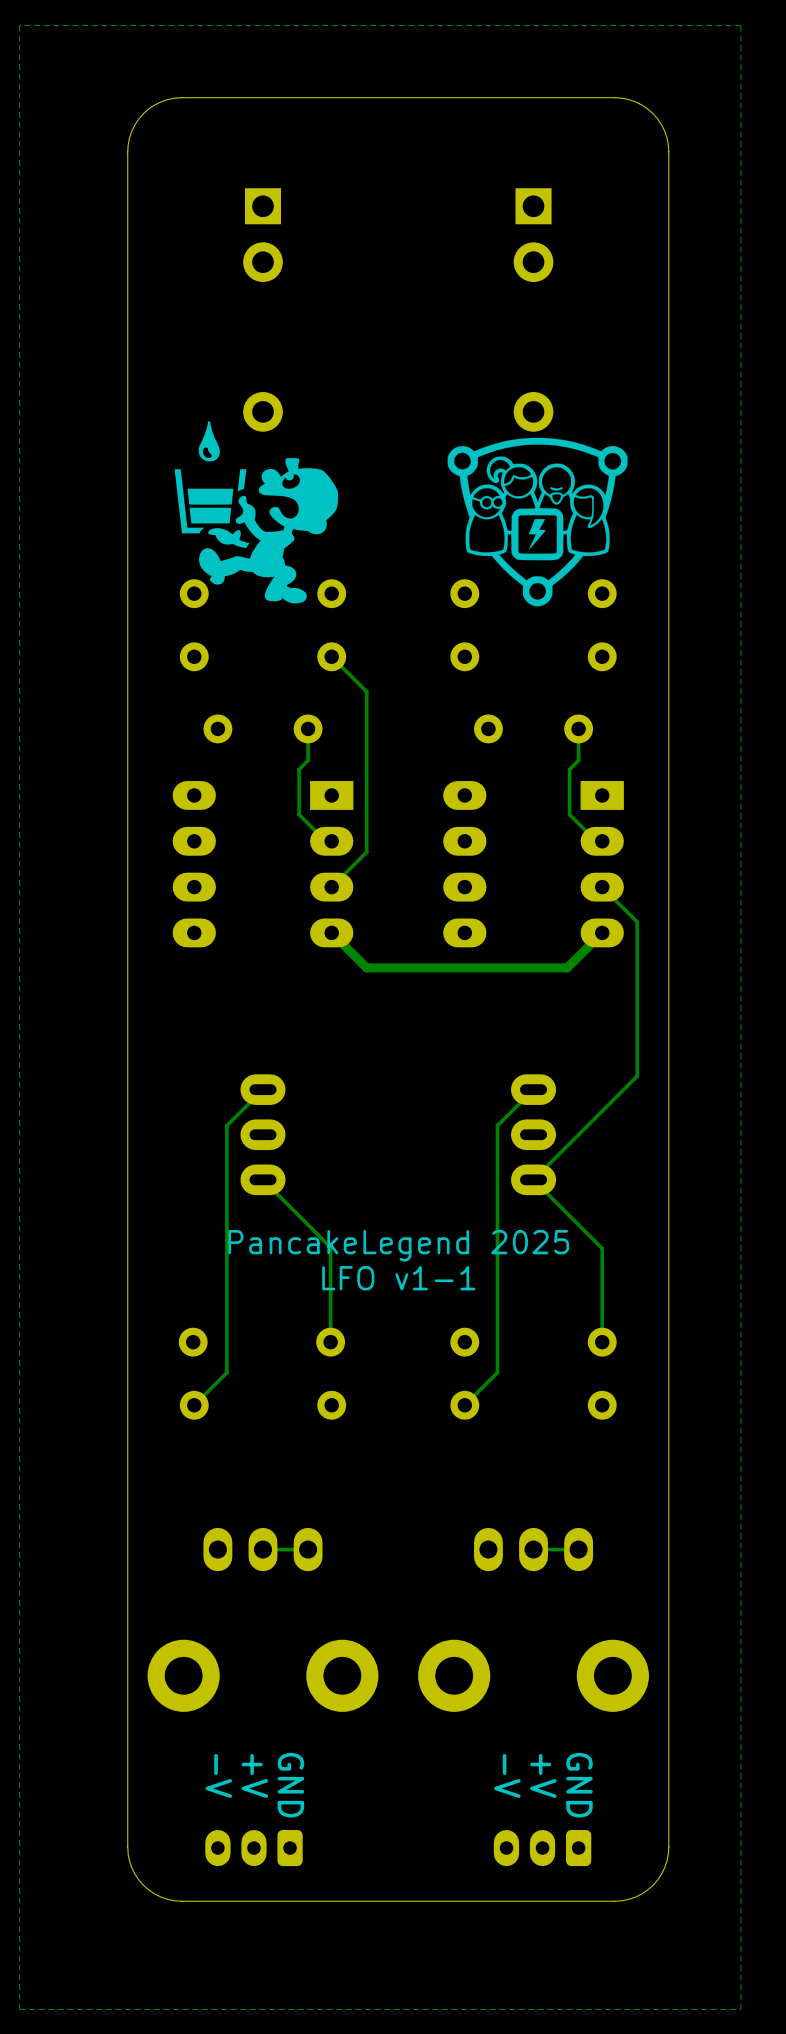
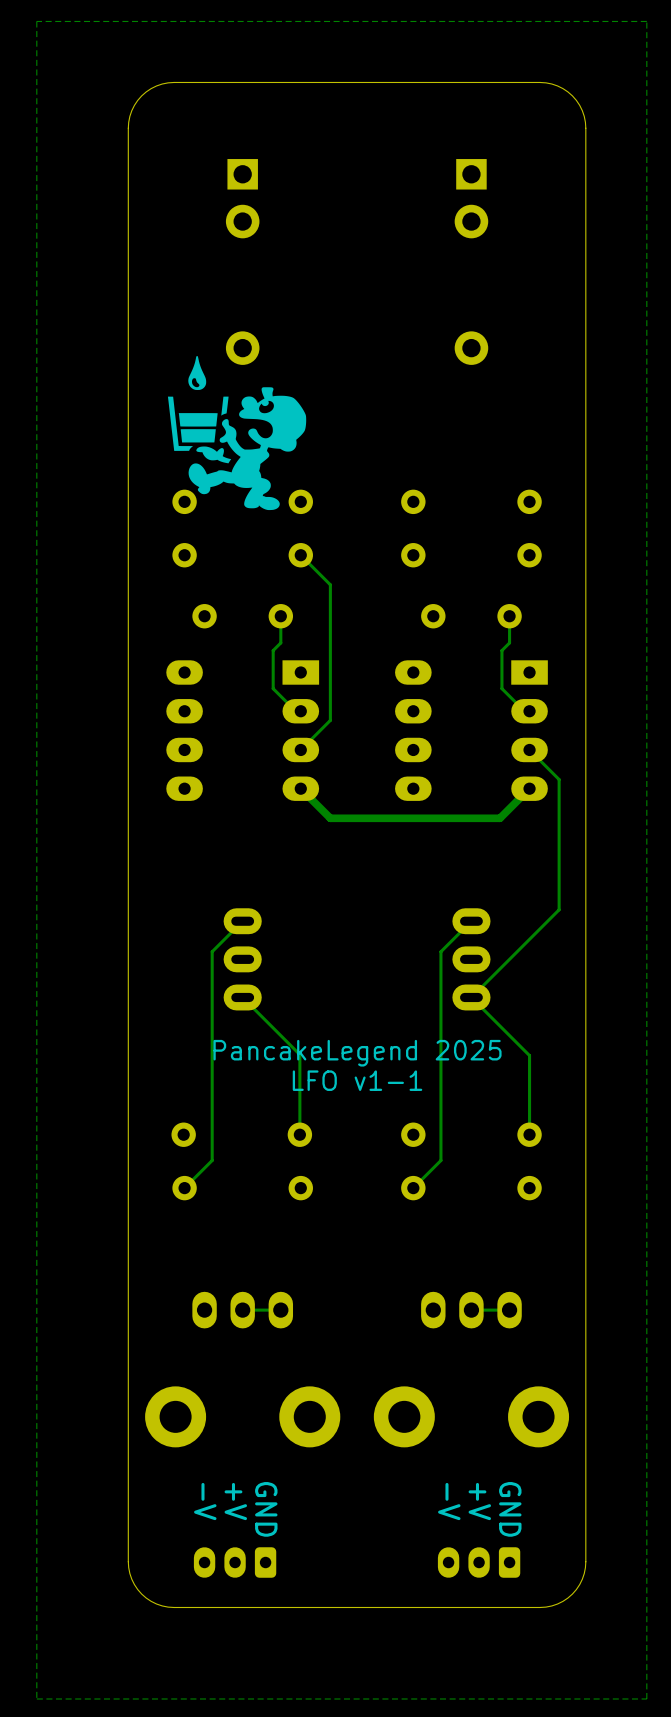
drawing: [447, 437, 628, 607] -> none

